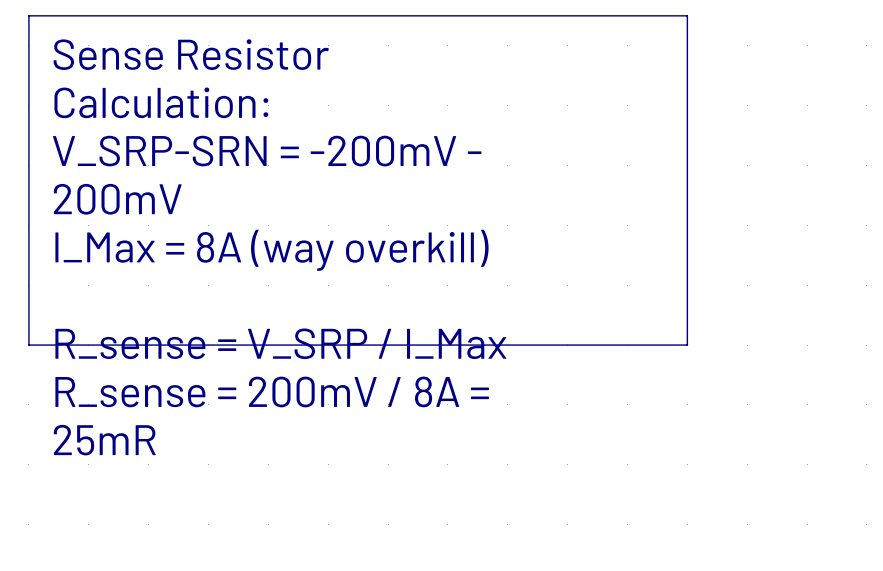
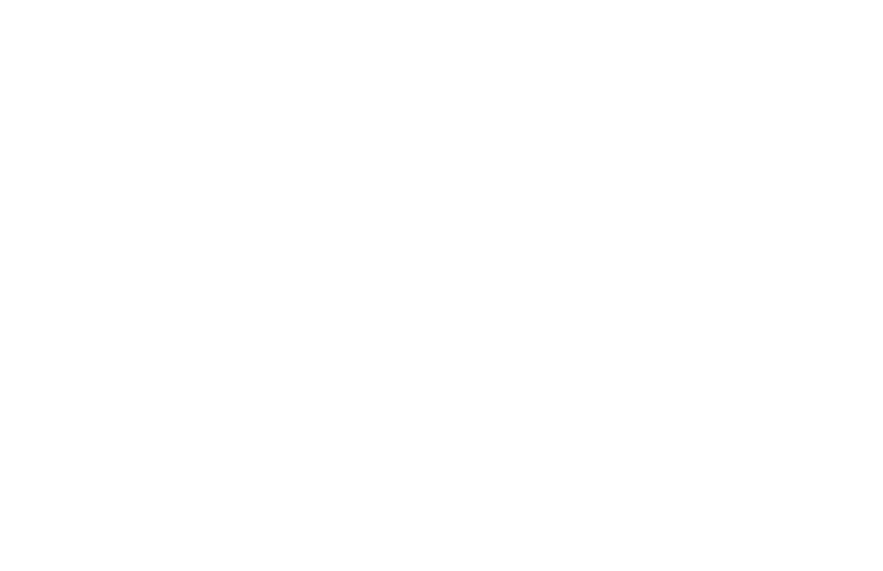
line: (28, 15) (687, 15) (687, 345) (28, 345) (28, 15) -> none
text: Sense Resistor (191, 54) -> none
text: Calculation: (161, 102) -> none
text: V_SRP-SRN = -200mV - (267, 151) -> none
text: 200mV (117, 199) -> none
text: I_Max = 8A (way overkill) (272, 250) -> none
text: R_sense = V_SRP / I_Max (280, 343) -> none
text: R_sense = 200mV / 8A = (272, 391) -> none
text: 25mR (104, 440) -> none

